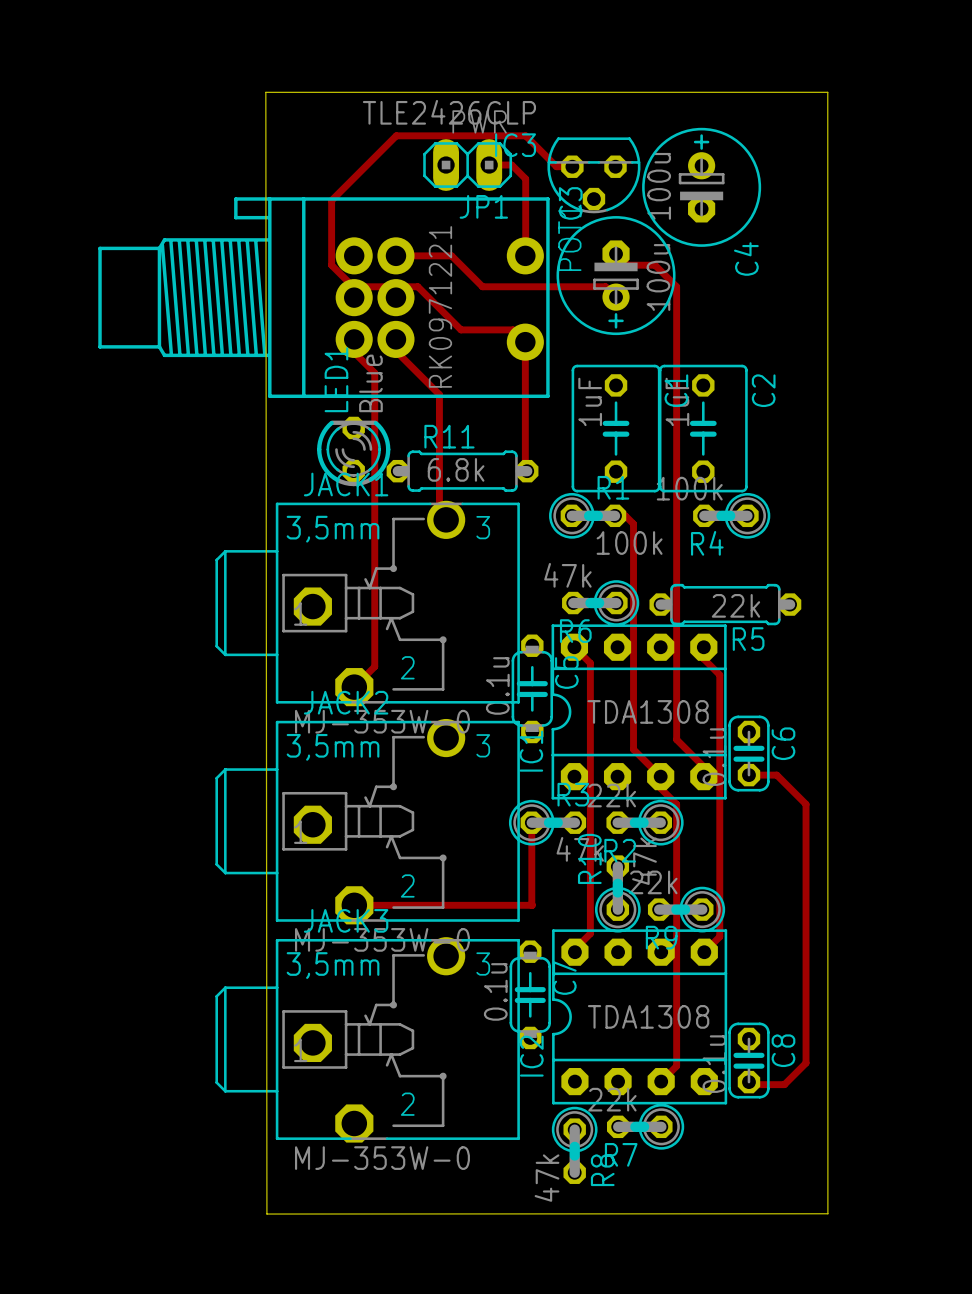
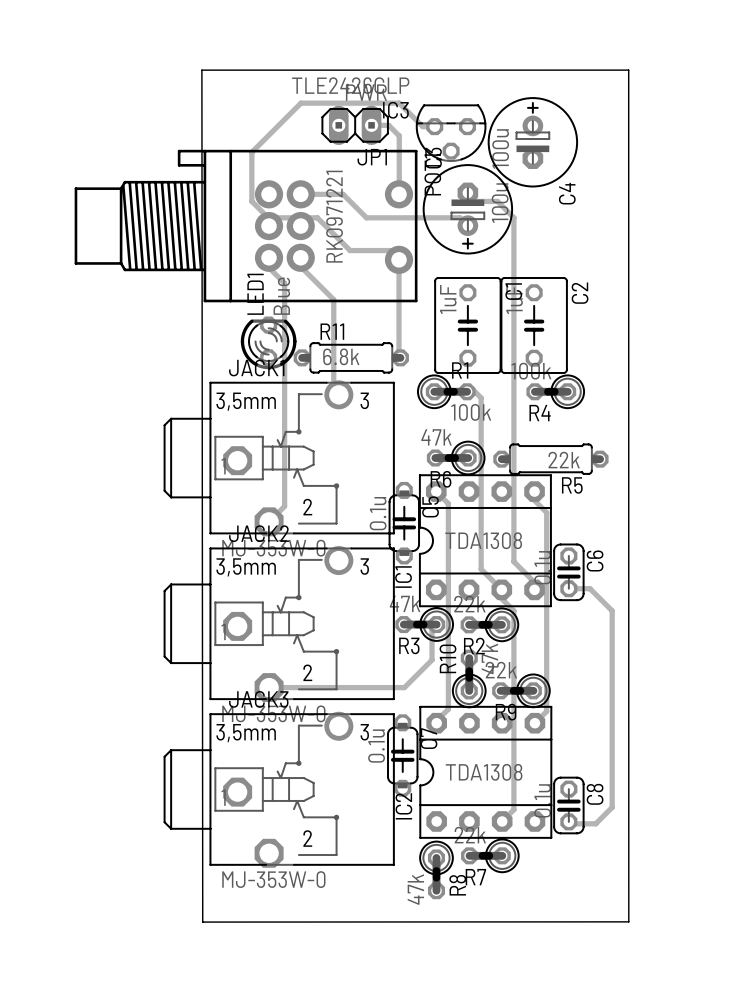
track: (531, 822) (531, 905) -> none
R3 rotation: 0° (547, 822) -> 180° (424, 624)
track: none -> (436, 624) (432, 629) (432, 660) (404, 687)

